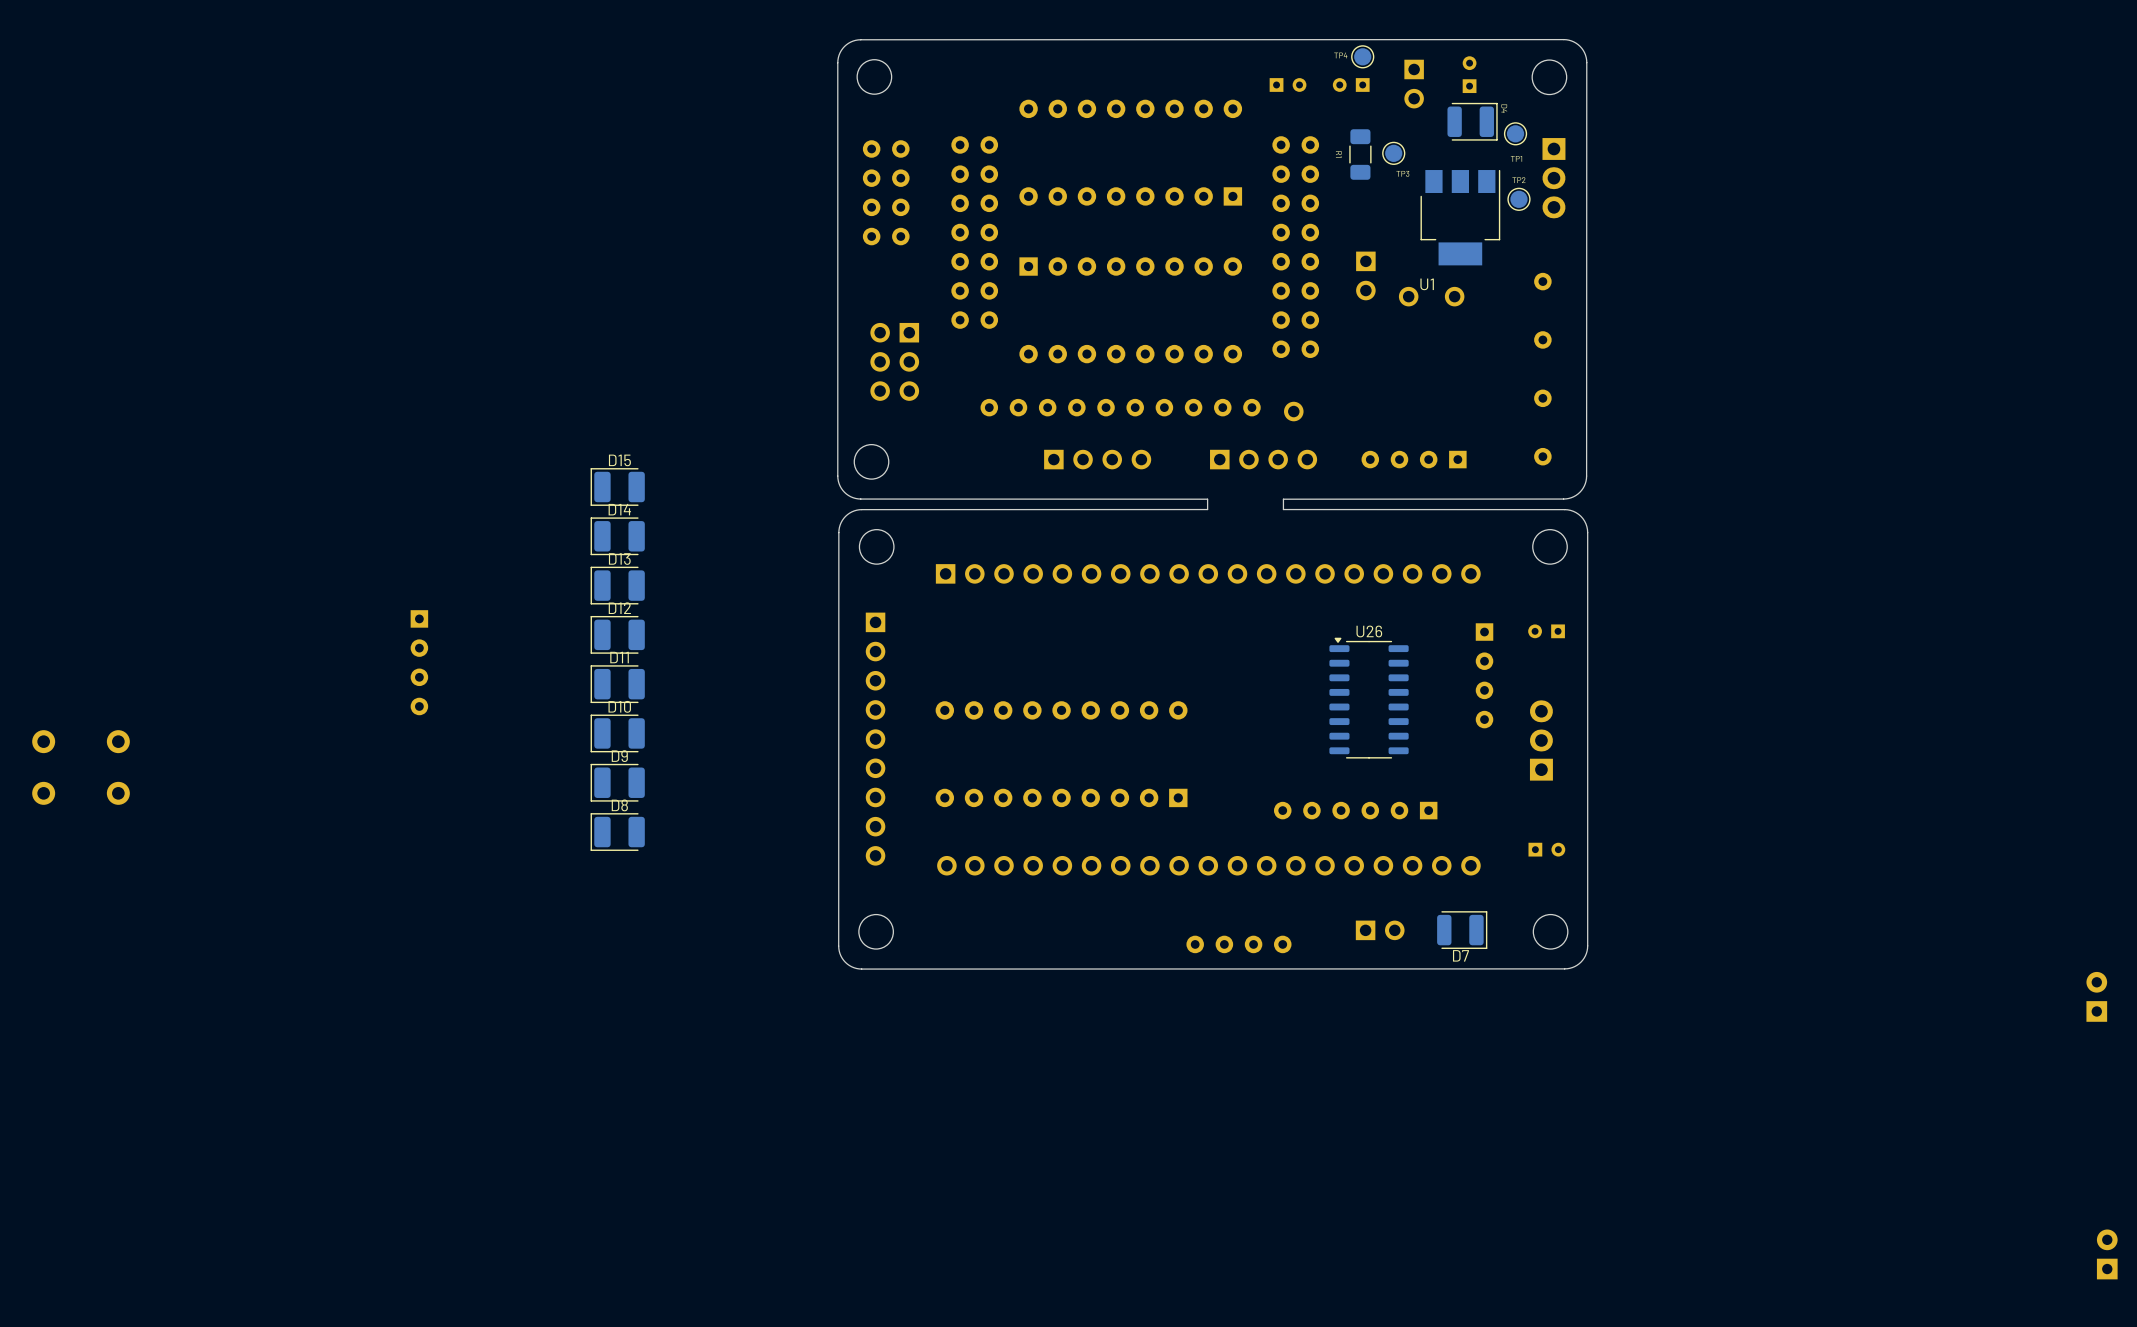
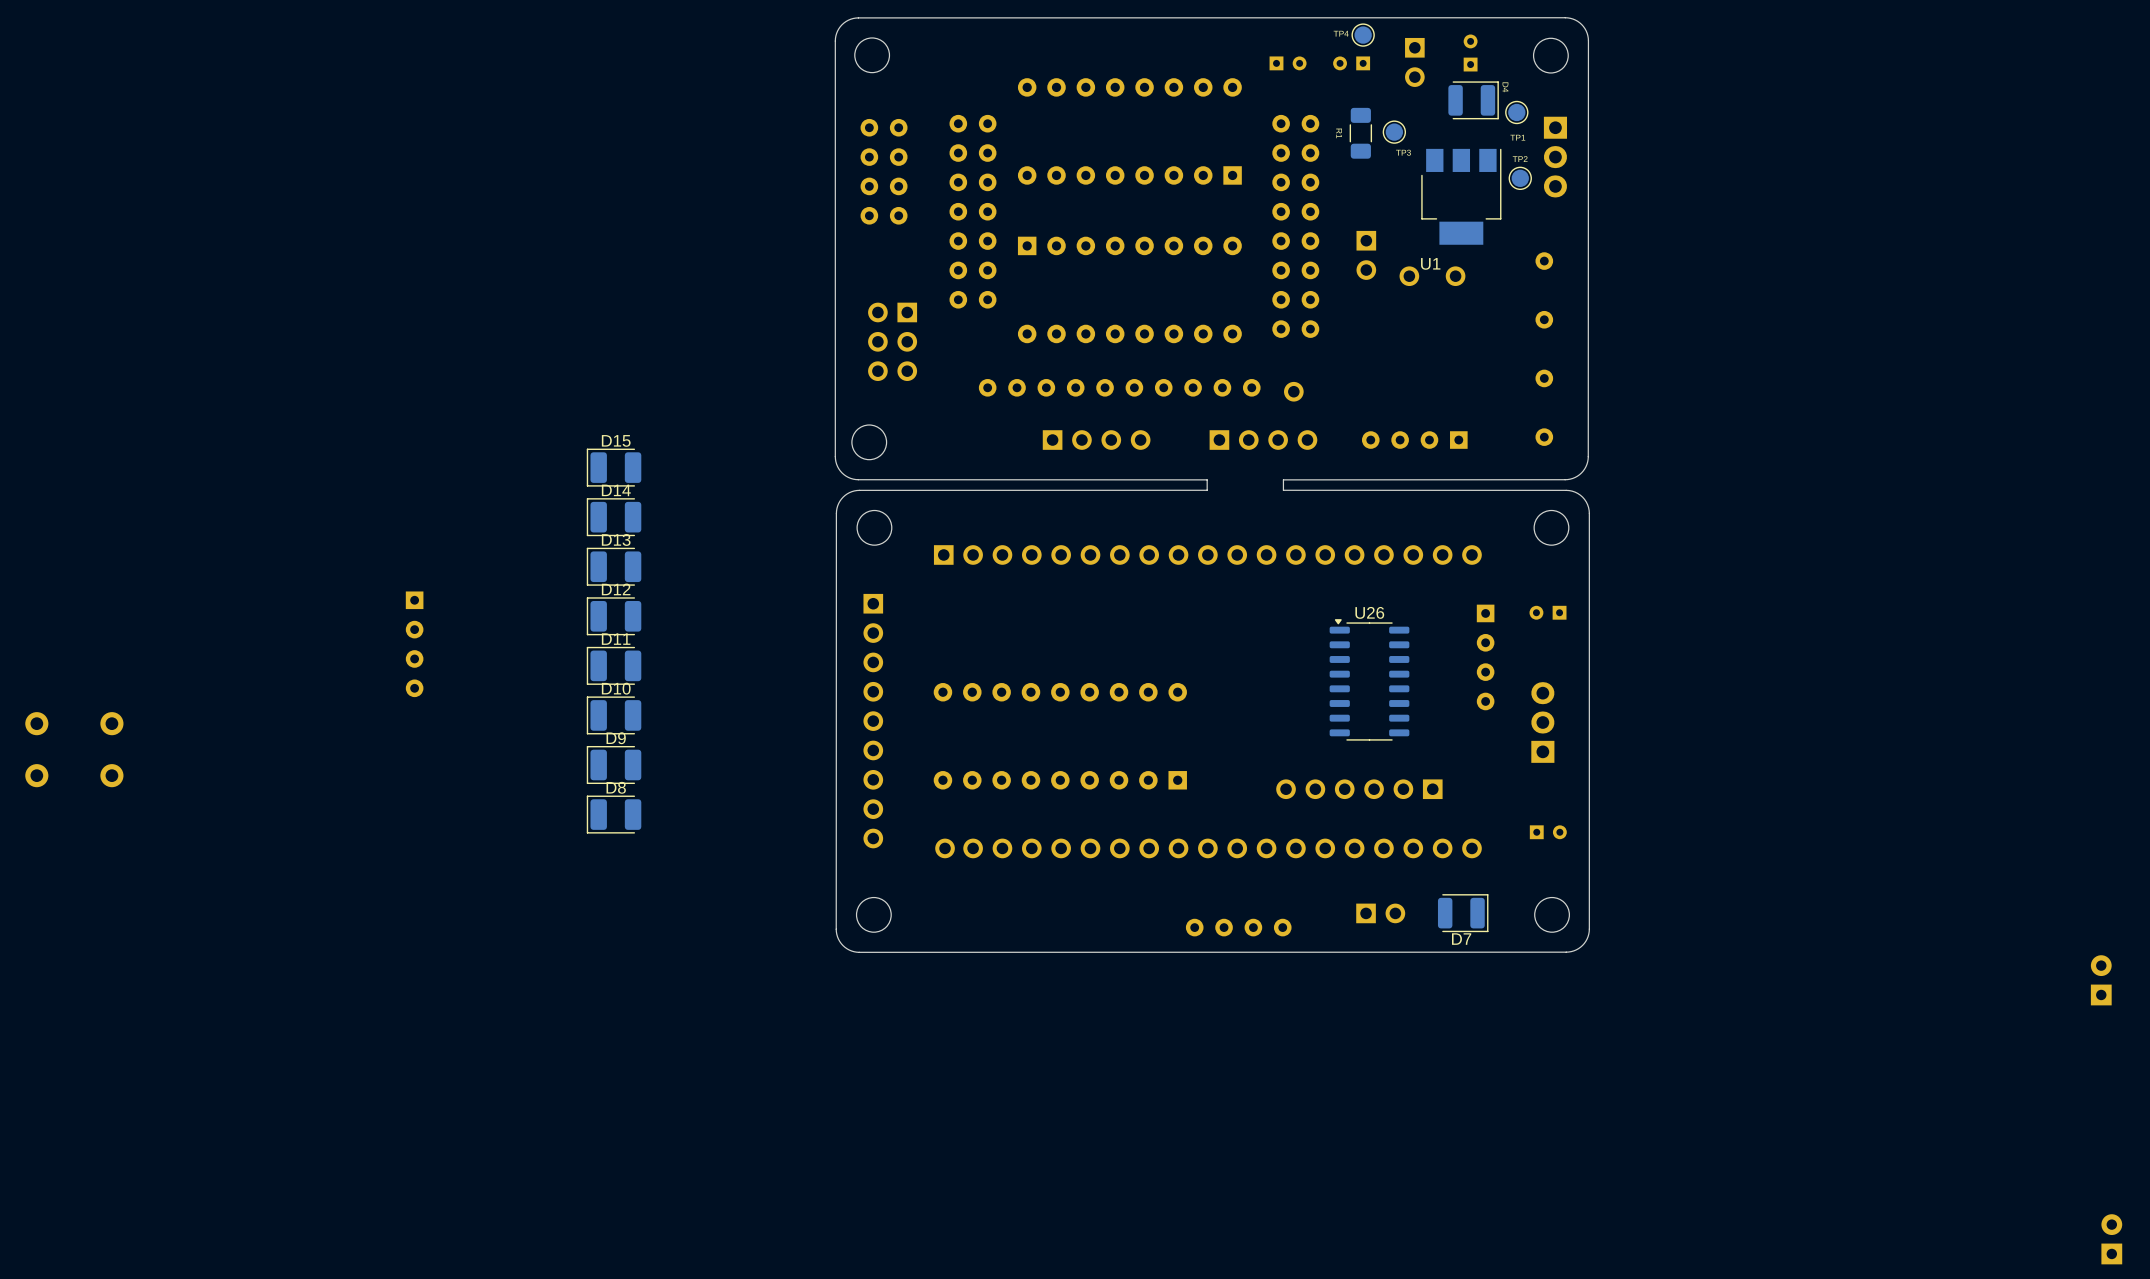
part footprint: [1273, 801, 1438, 820] -> [1276, 779, 1443, 800]

